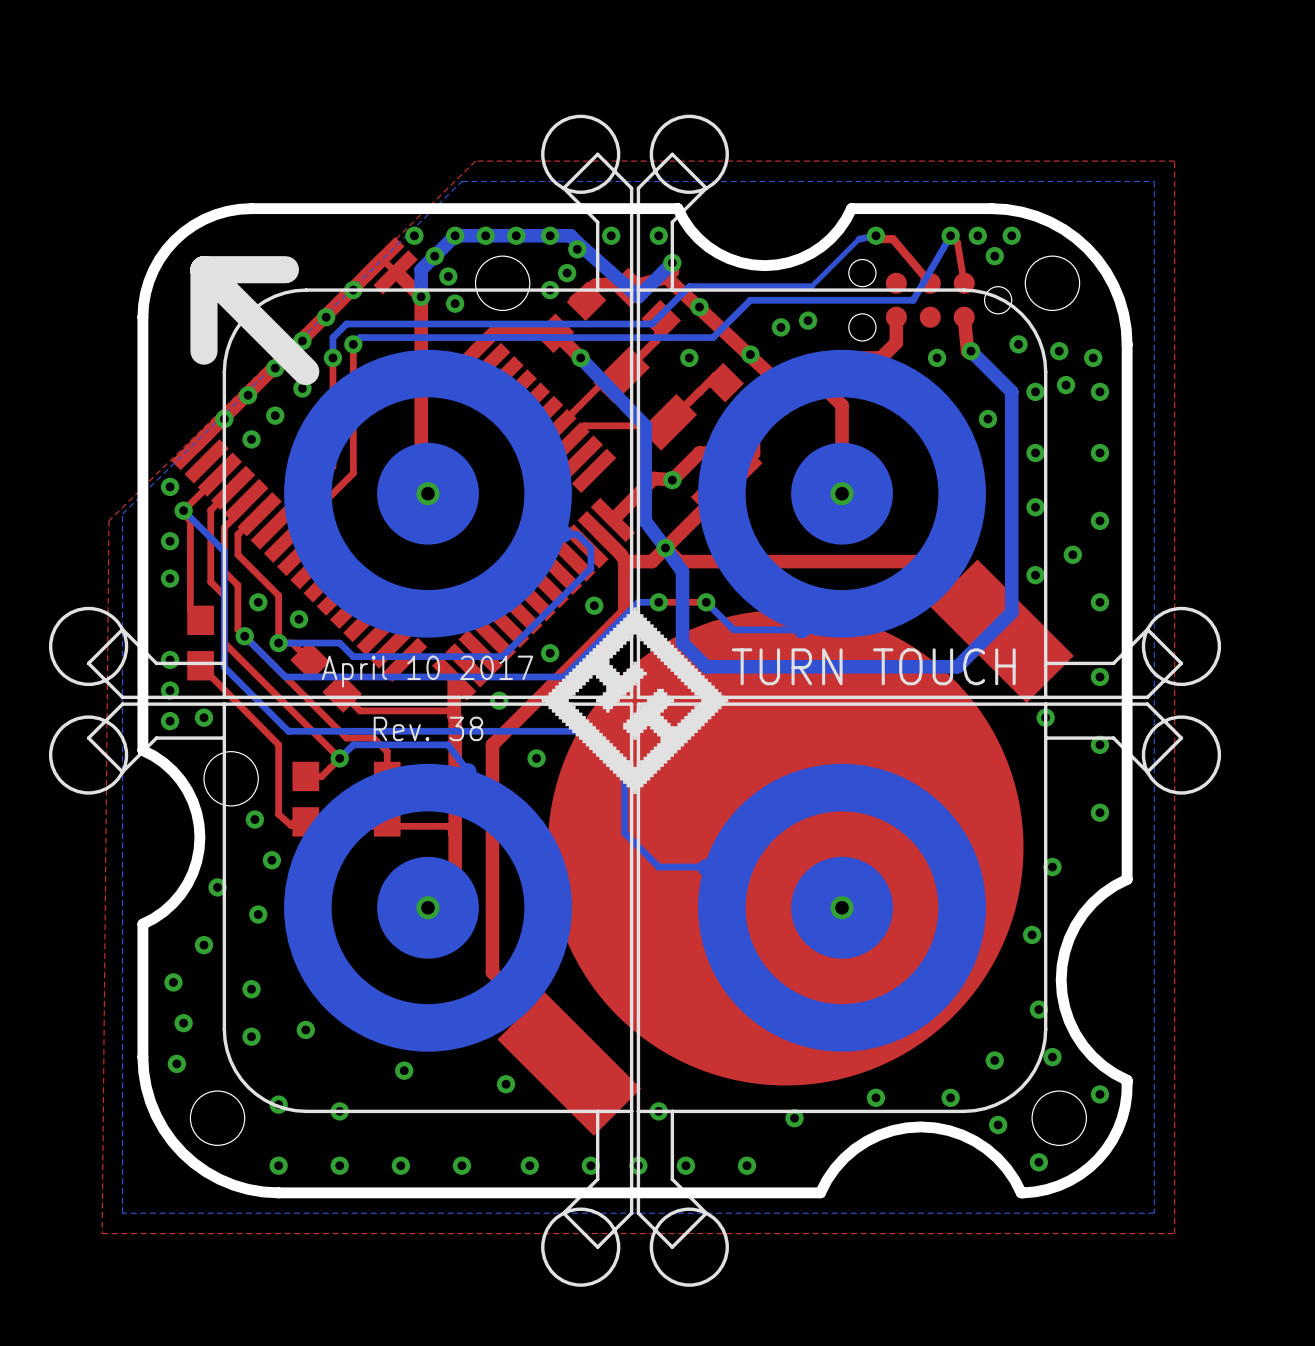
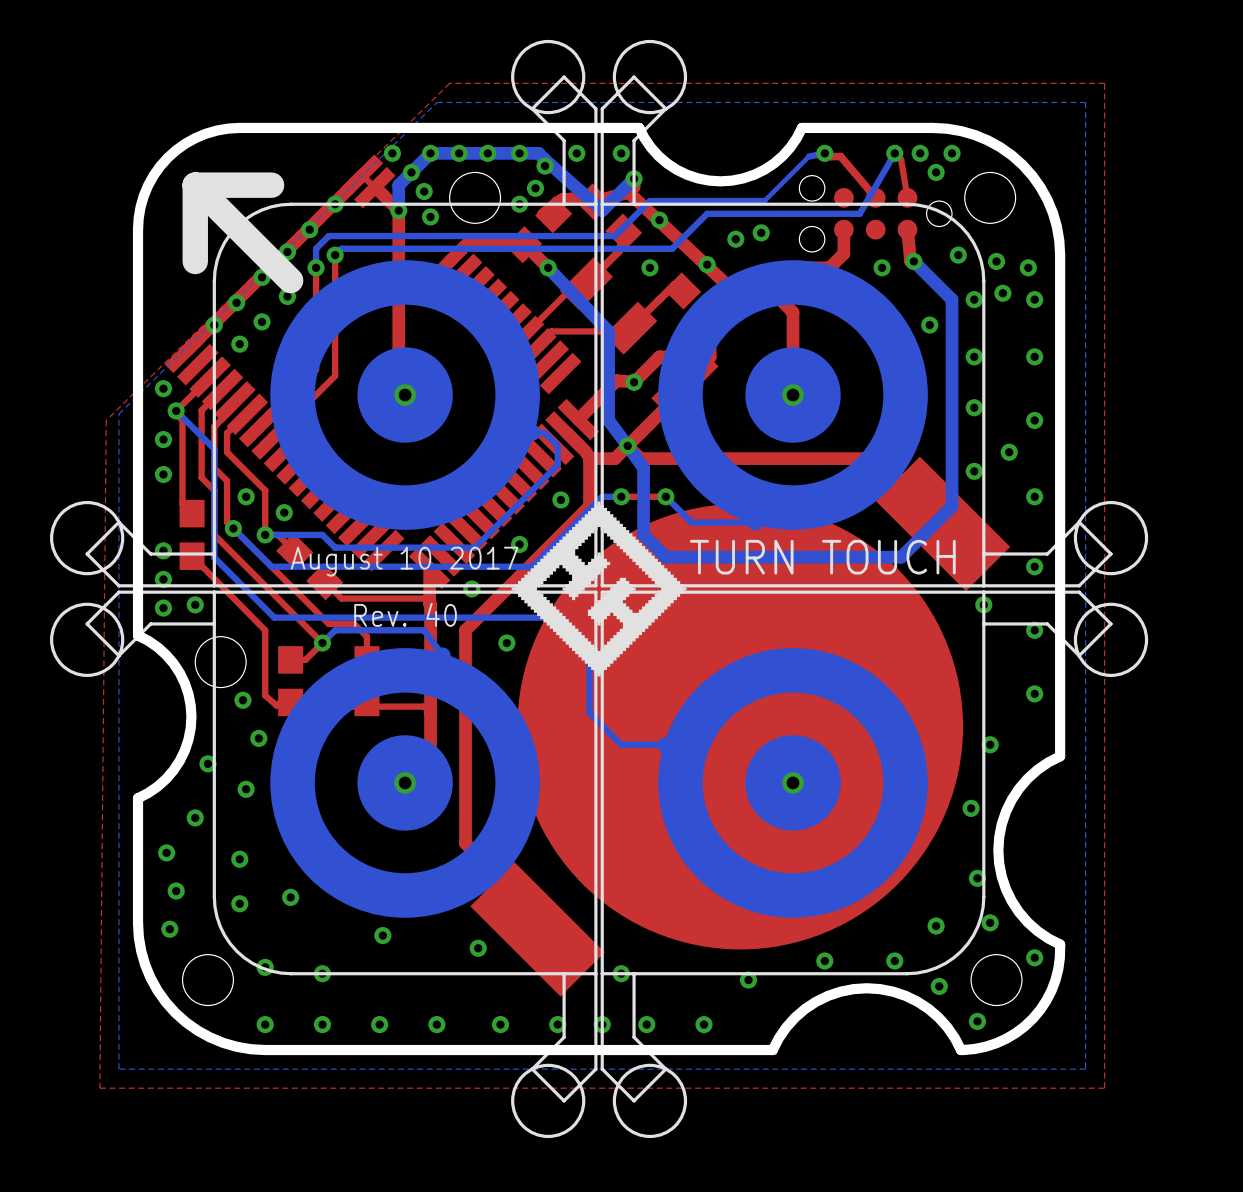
text: April 10 2017 (427, 671) -> August 10 2017 (404, 561)
text: Rev. 38 (428, 728) -> Rev. 40 (405, 614)

